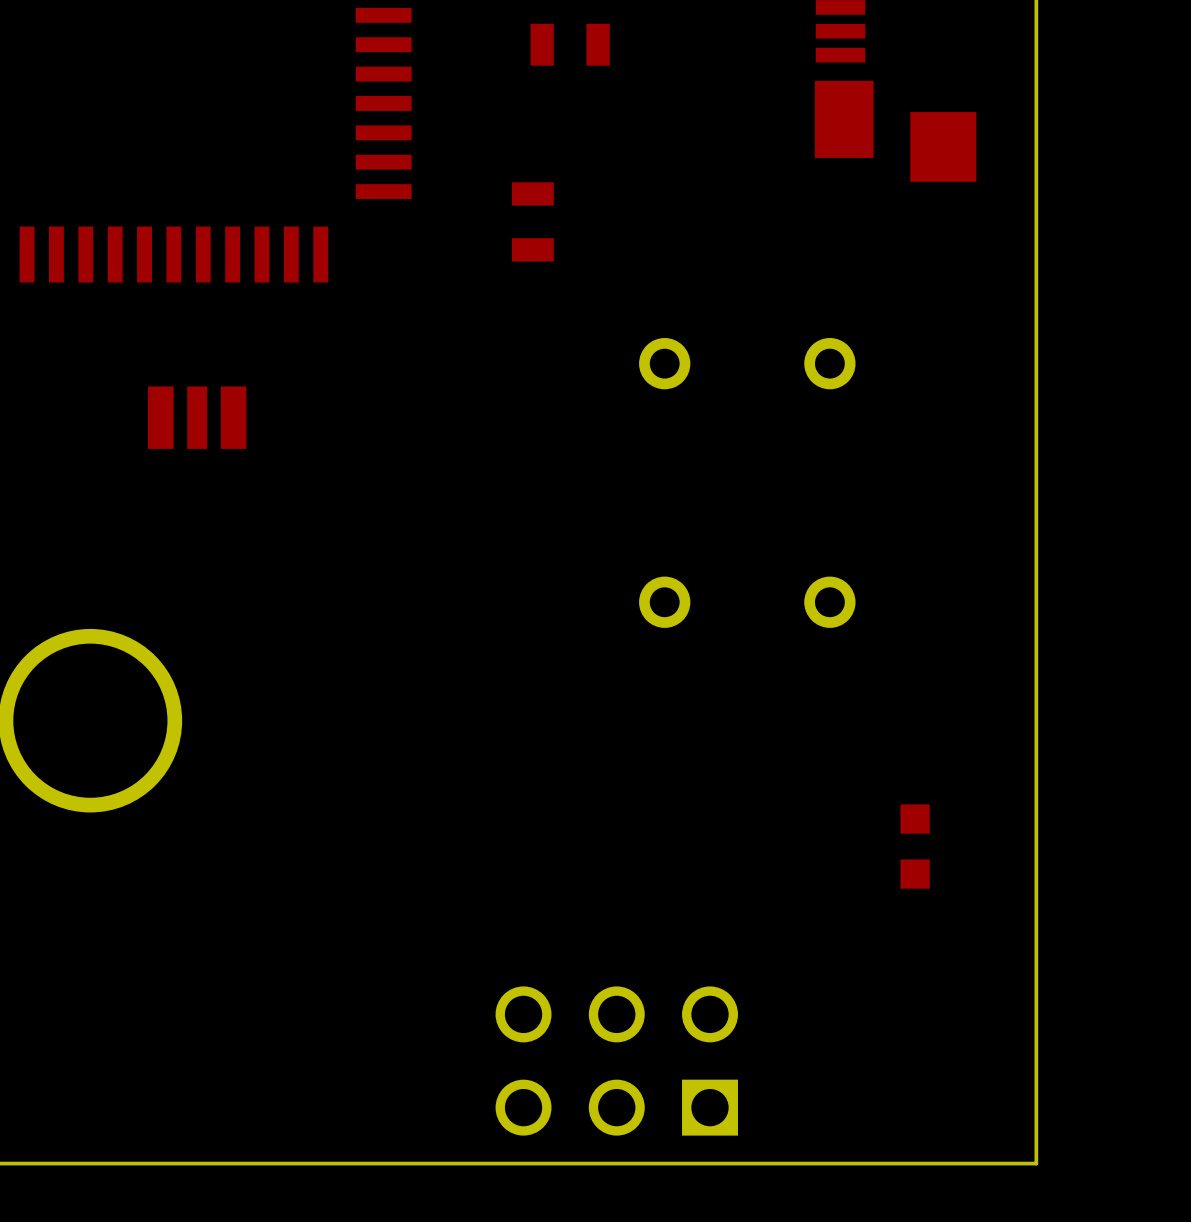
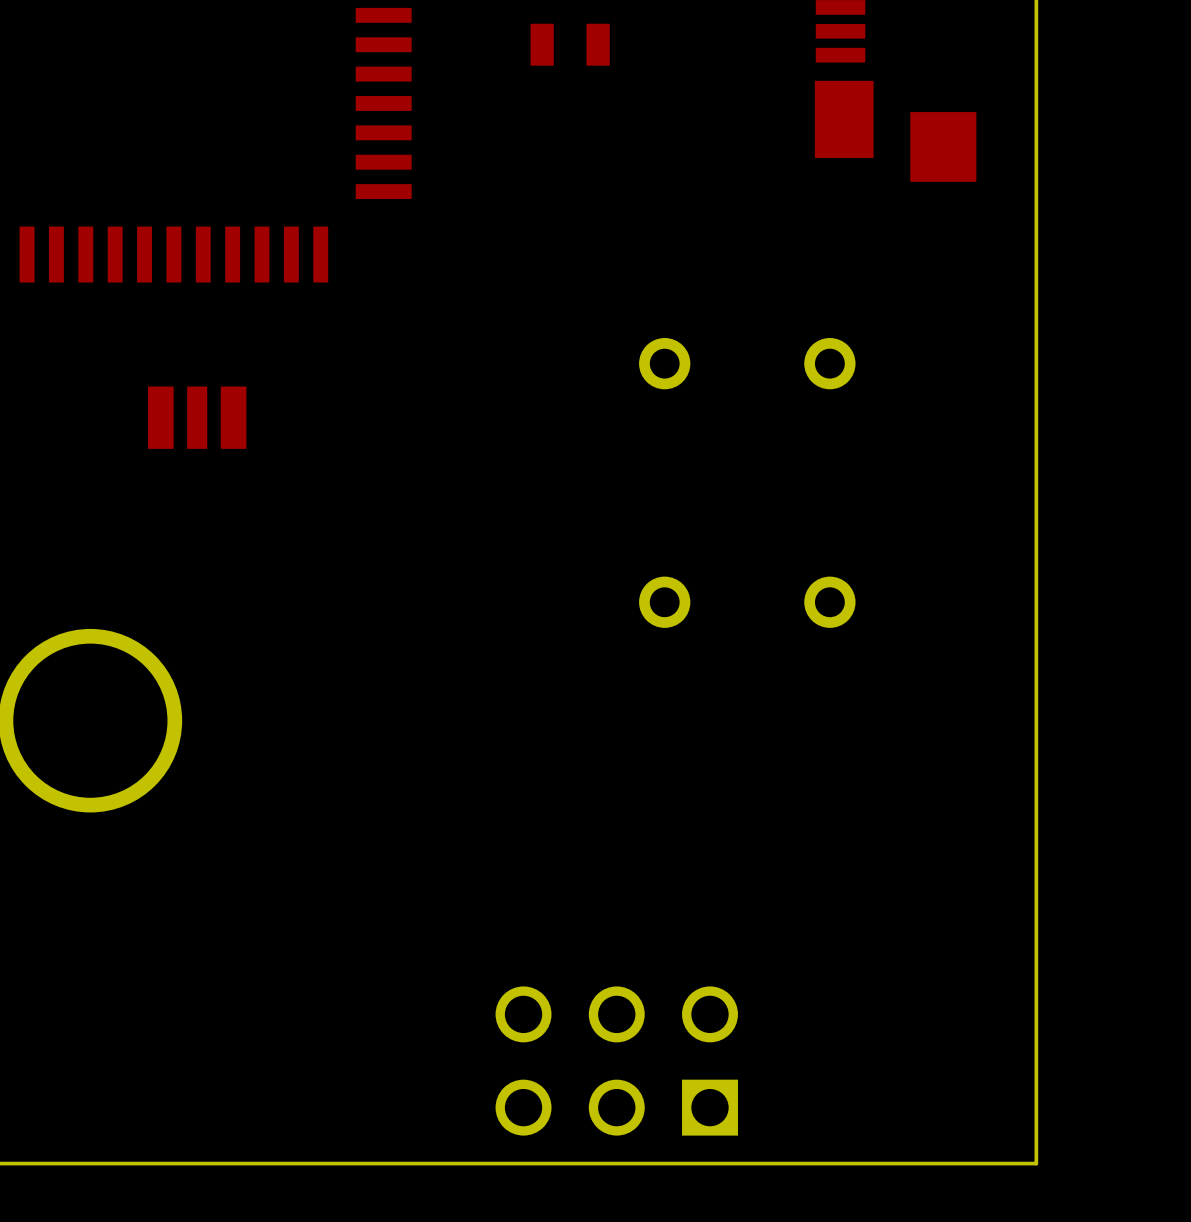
part: (532, 221) -> none
part: (915, 846) -> none

